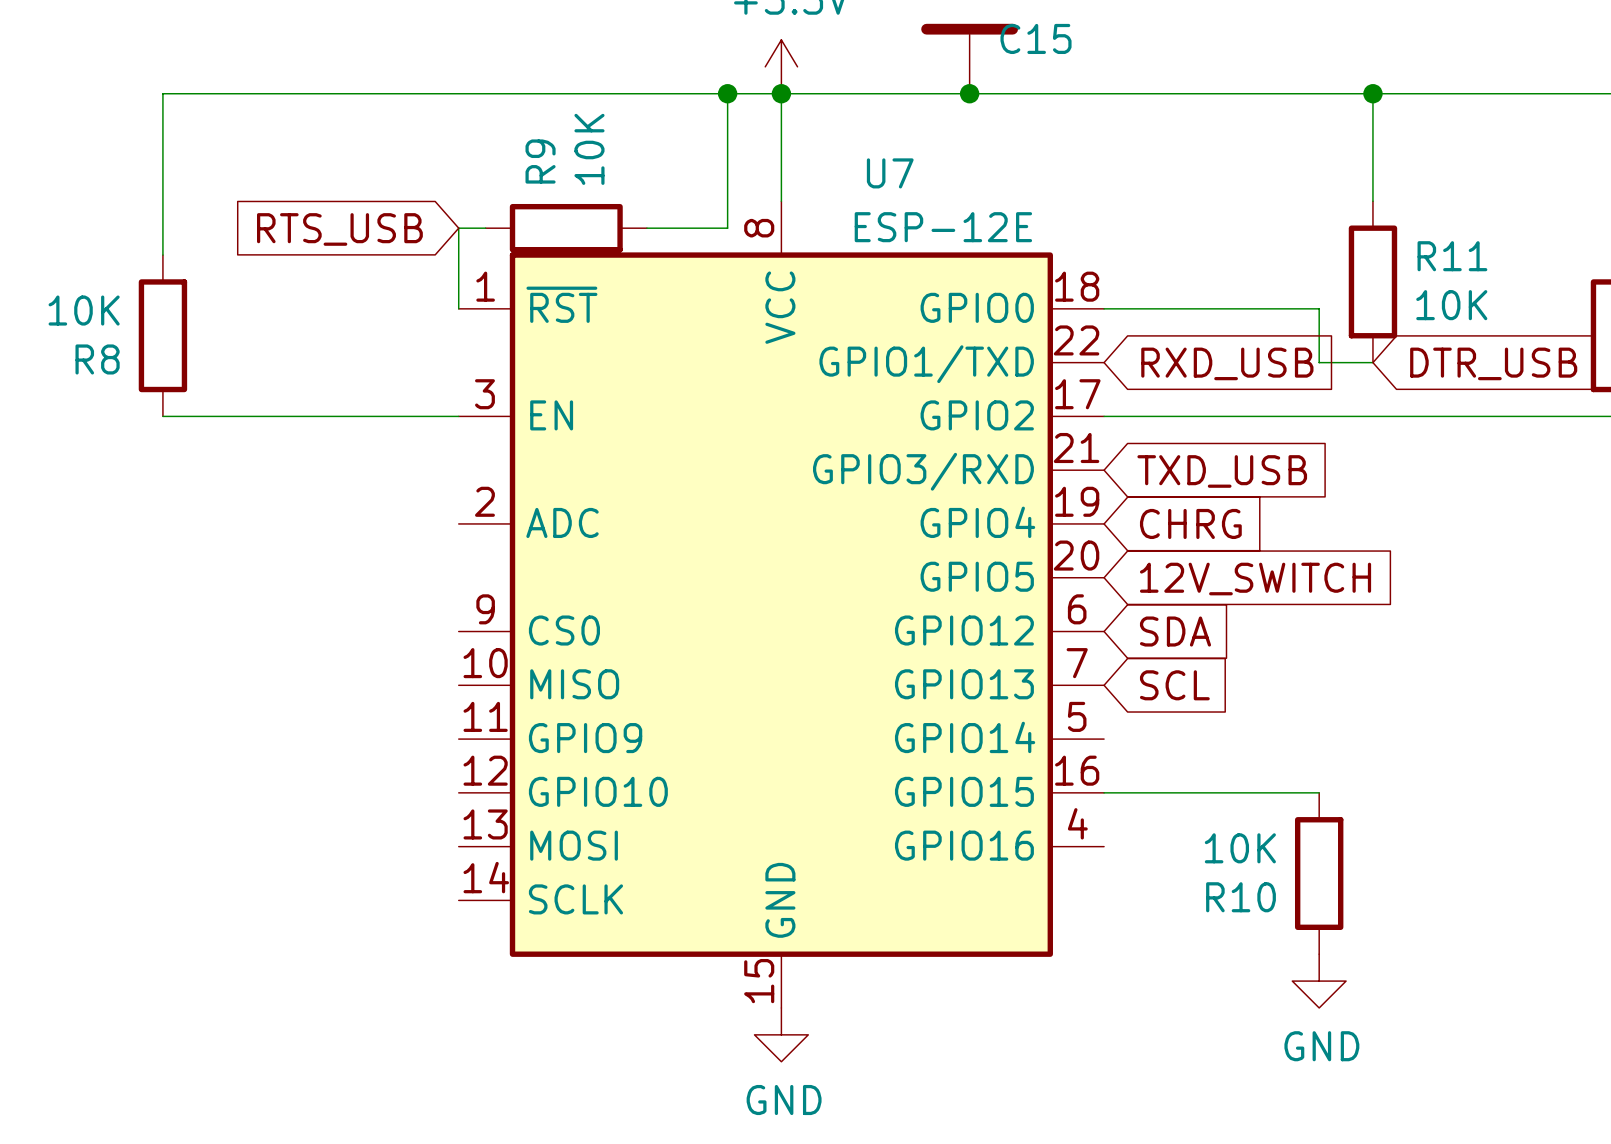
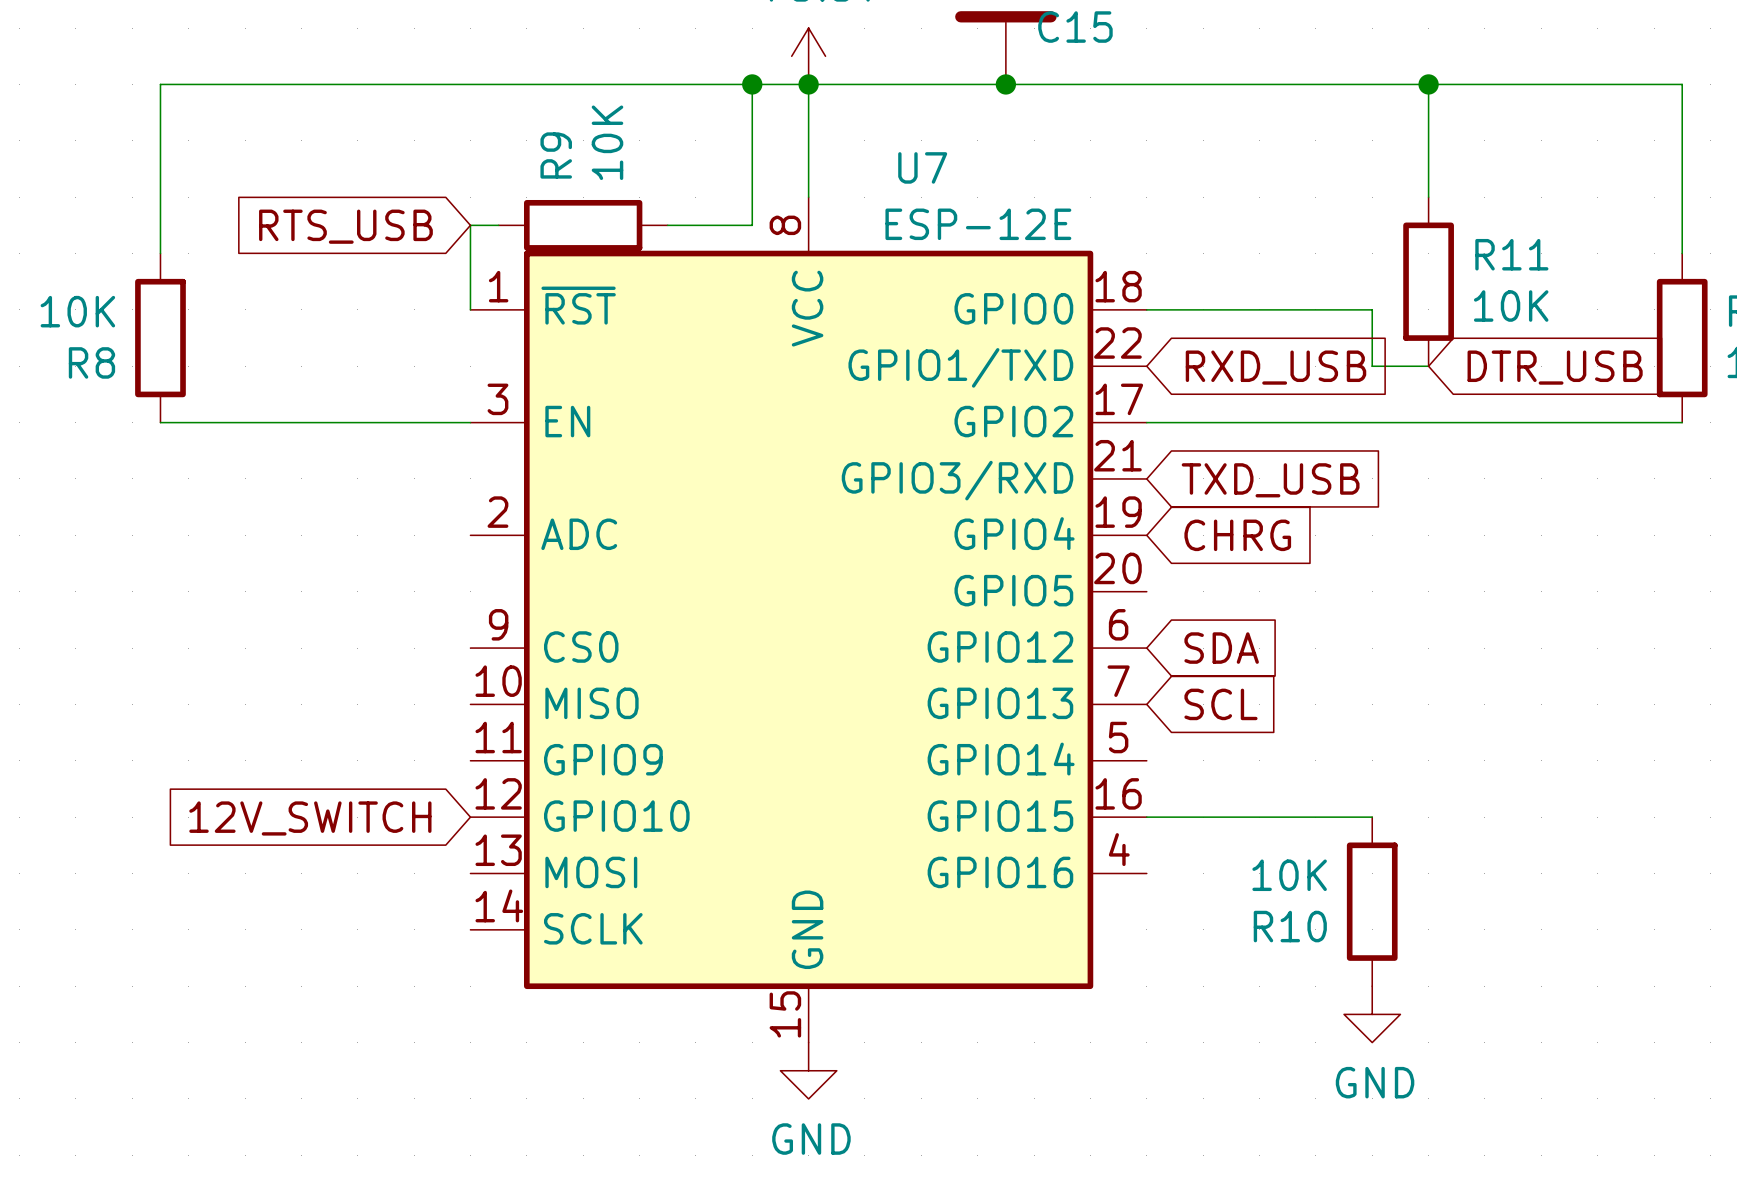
global label: 12V_SWITCH (1255, 579) -> none
global label: none -> 12V_SWITCH (310, 818)

